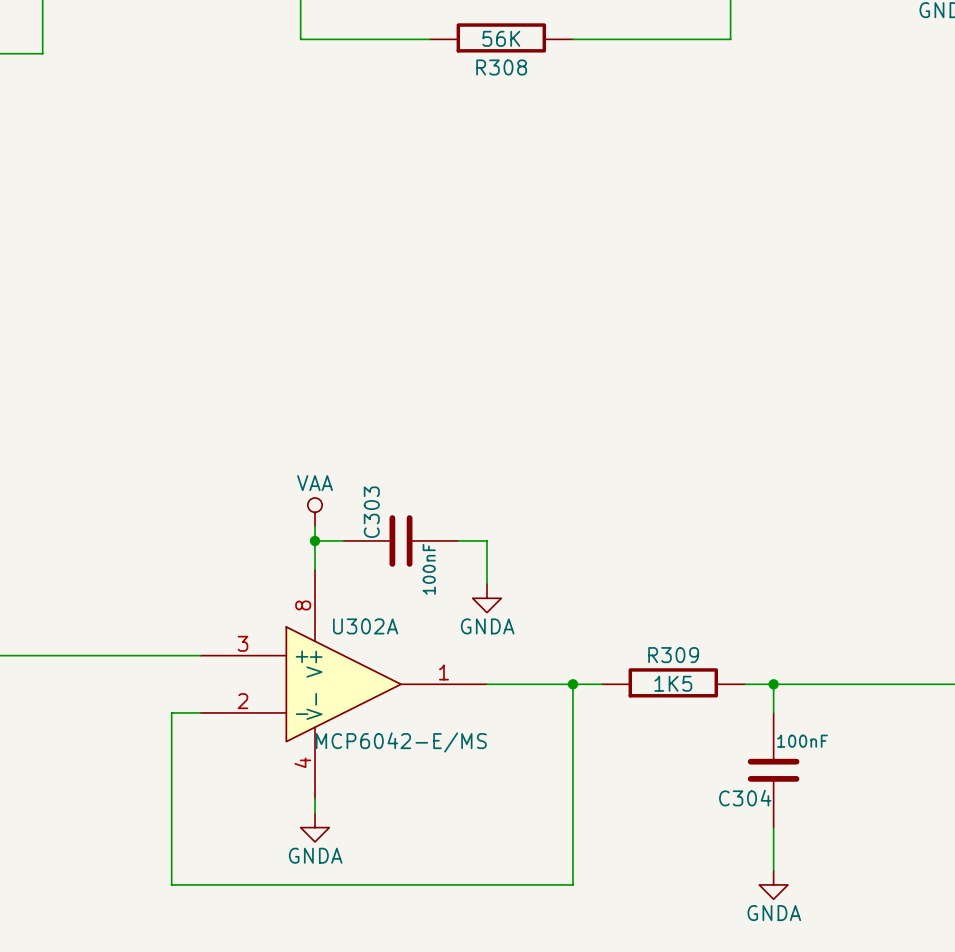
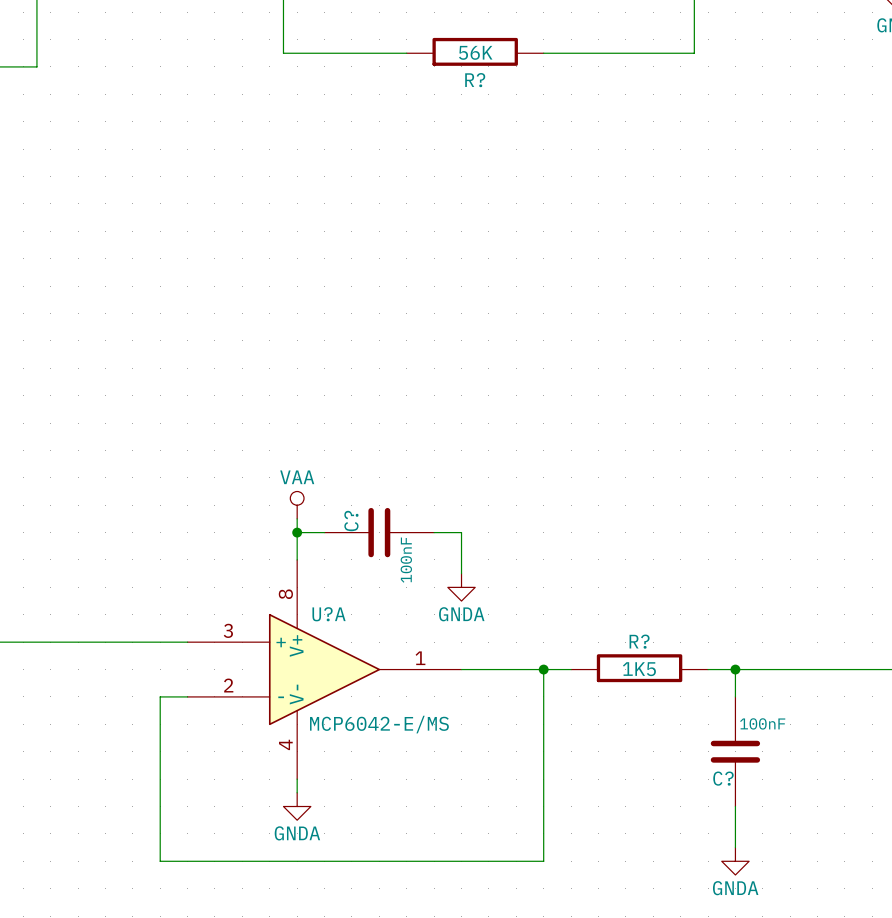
R308 name: R308 (501, 67) -> R? (475, 80)
C303 name: C303 (371, 512) -> C? (351, 521)
U302A name: U302A (365, 626) -> U?A (329, 614)
R309 name: R309 (673, 655) -> R? (639, 641)
C304 name: C304 (745, 798) -> C? (723, 778)

